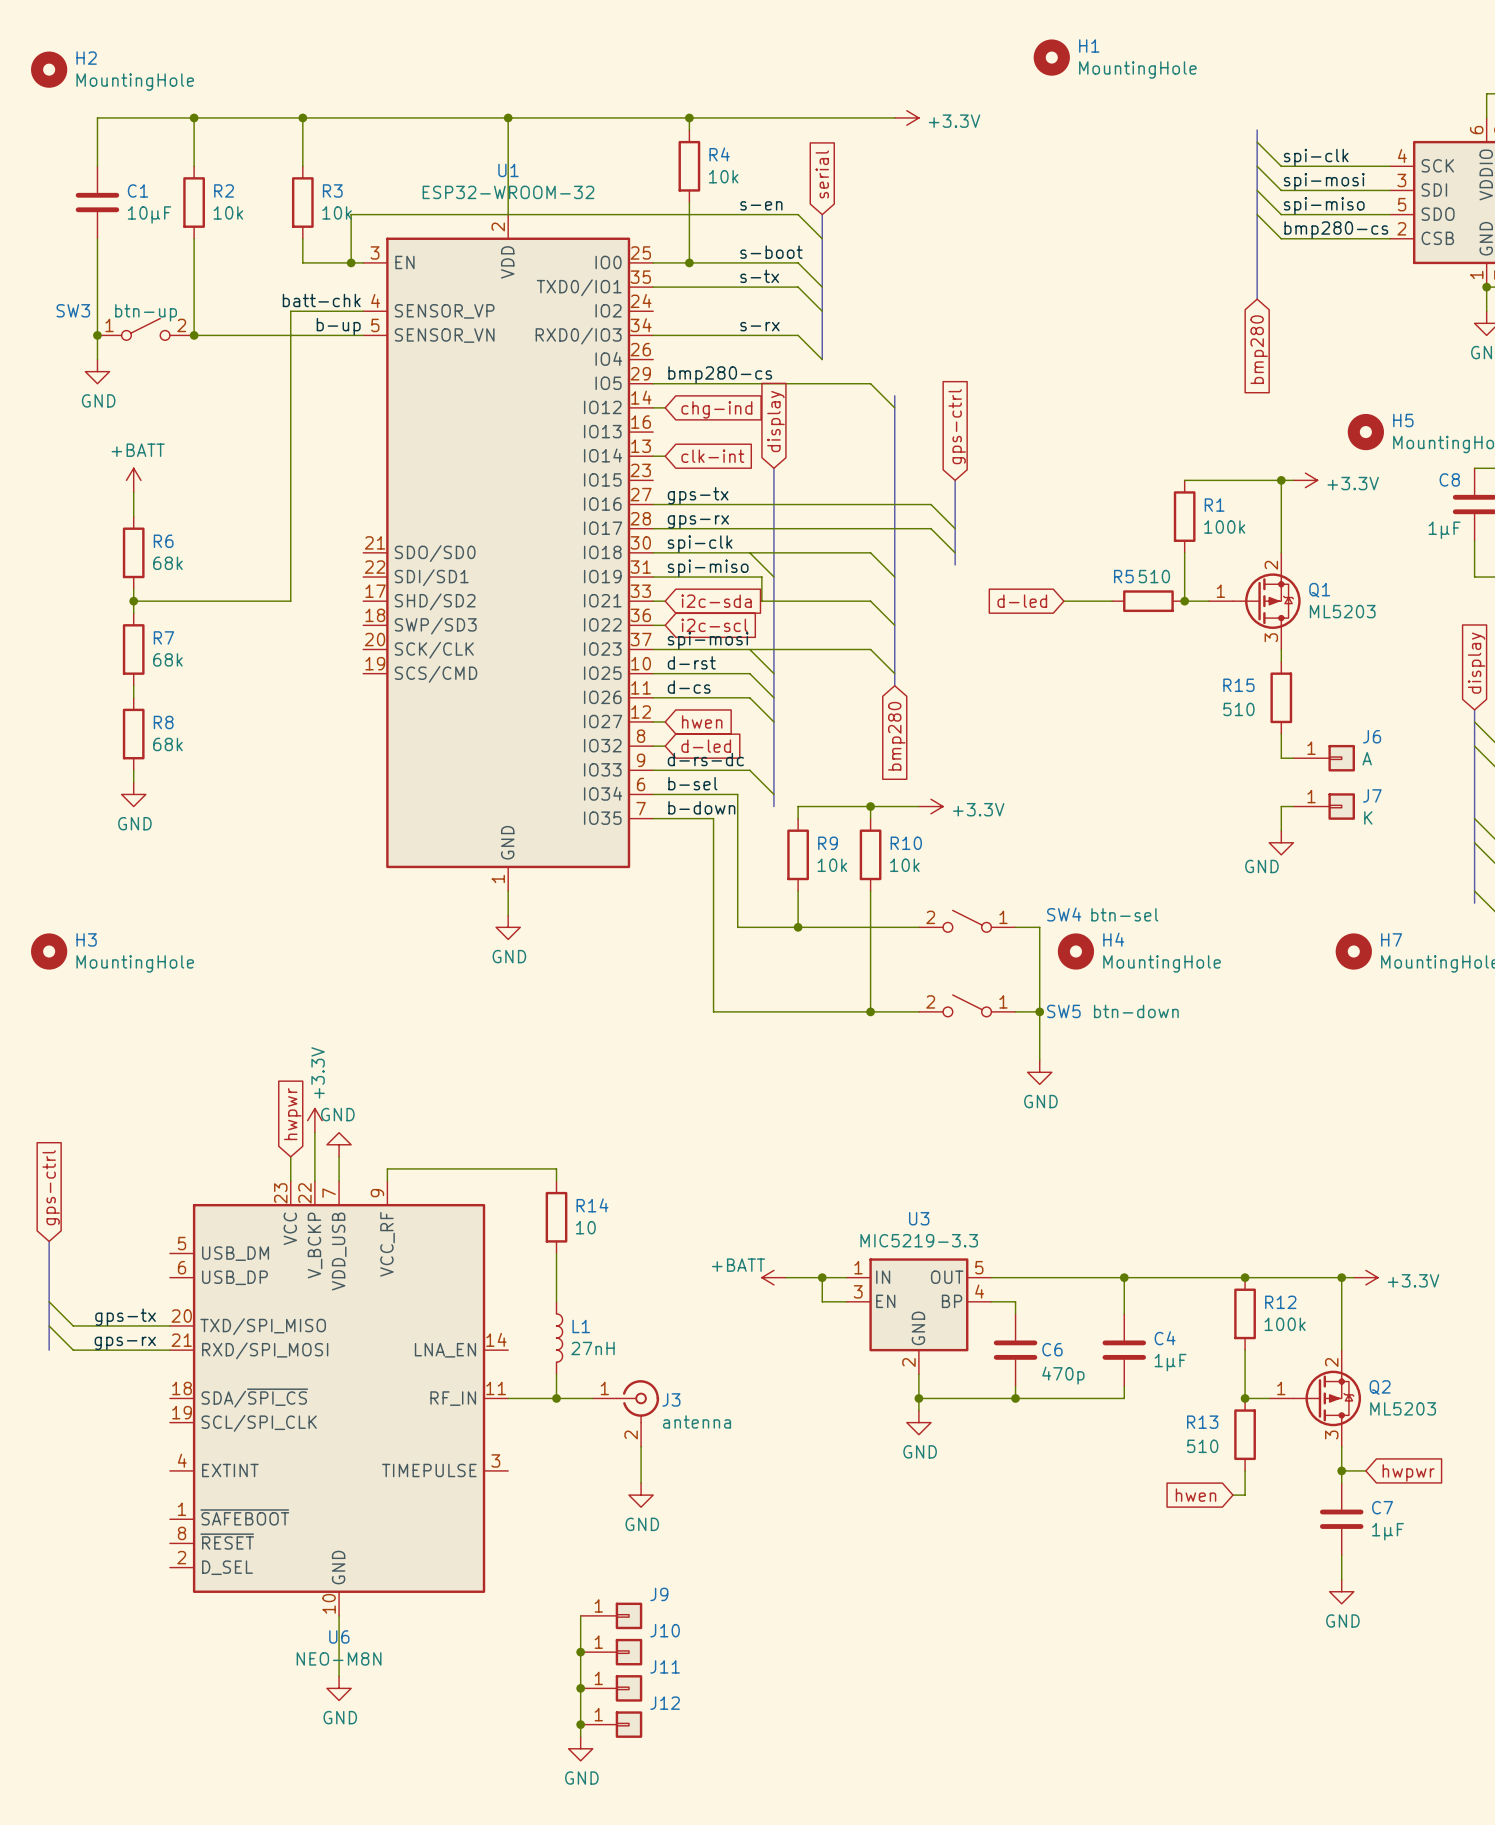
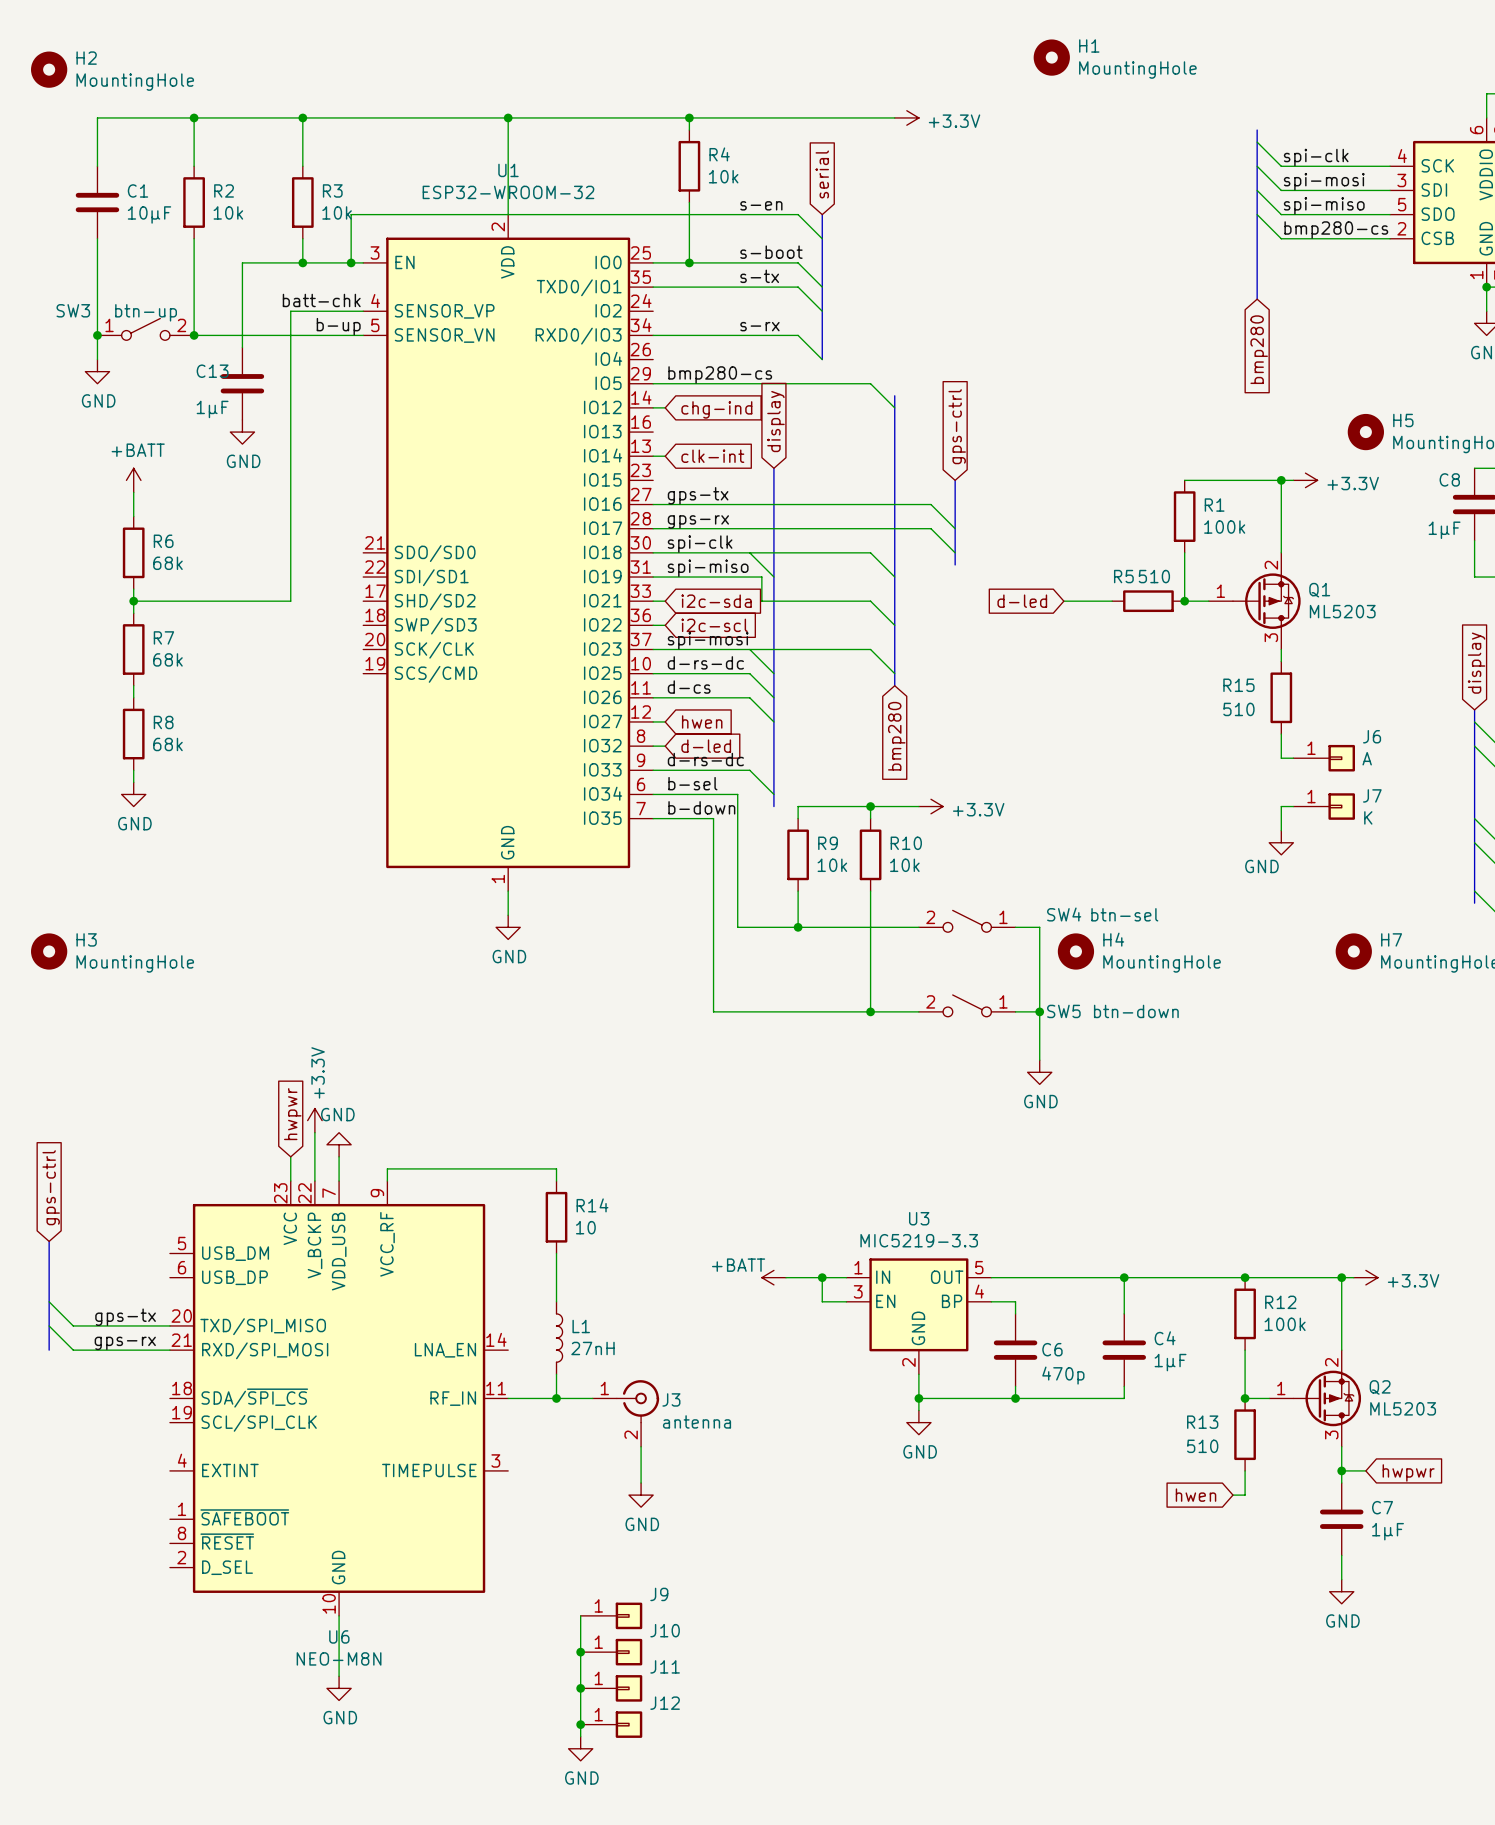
wire: none -> (302, 262) (242, 262) (242, 347)
junction: none -> (302, 262)
C13: none -> 1μF (242, 383)
power symbol: none -> GND (242, 432)
label: d-rst (691, 662) -> d-rs-dc (705, 662)

